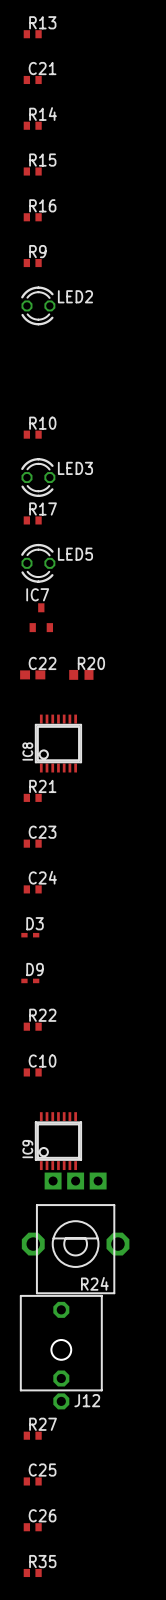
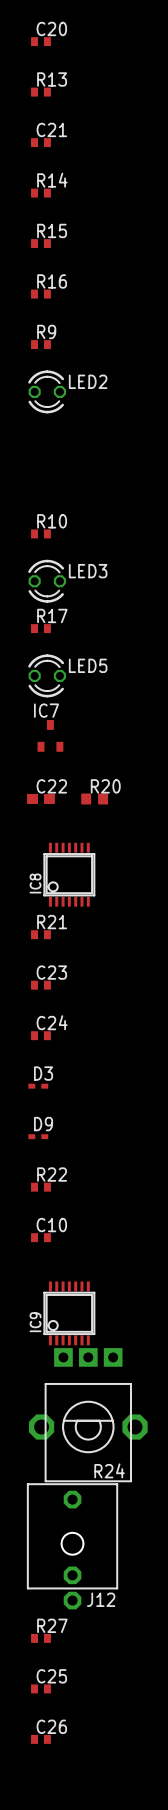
R35: (32, 1572) -> none

